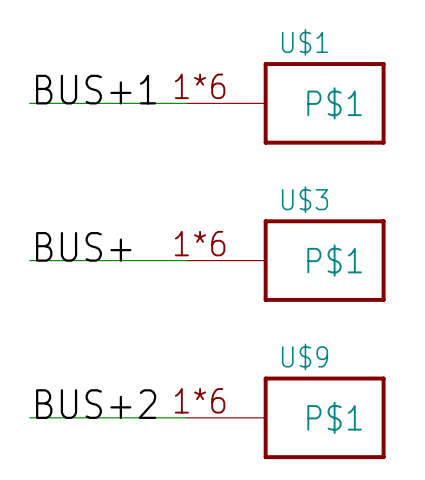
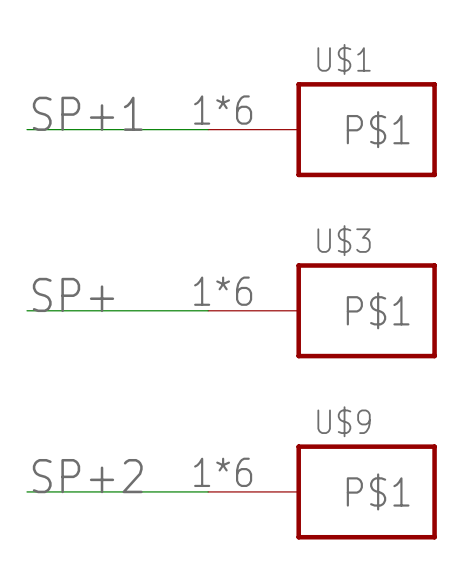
label: BUS+1 (96, 89) -> SP+1 (87, 113)
label: BUS+ (83, 246) -> SP+ (73, 294)
label: BUS+2 (96, 404) -> SP+2 (87, 476)

